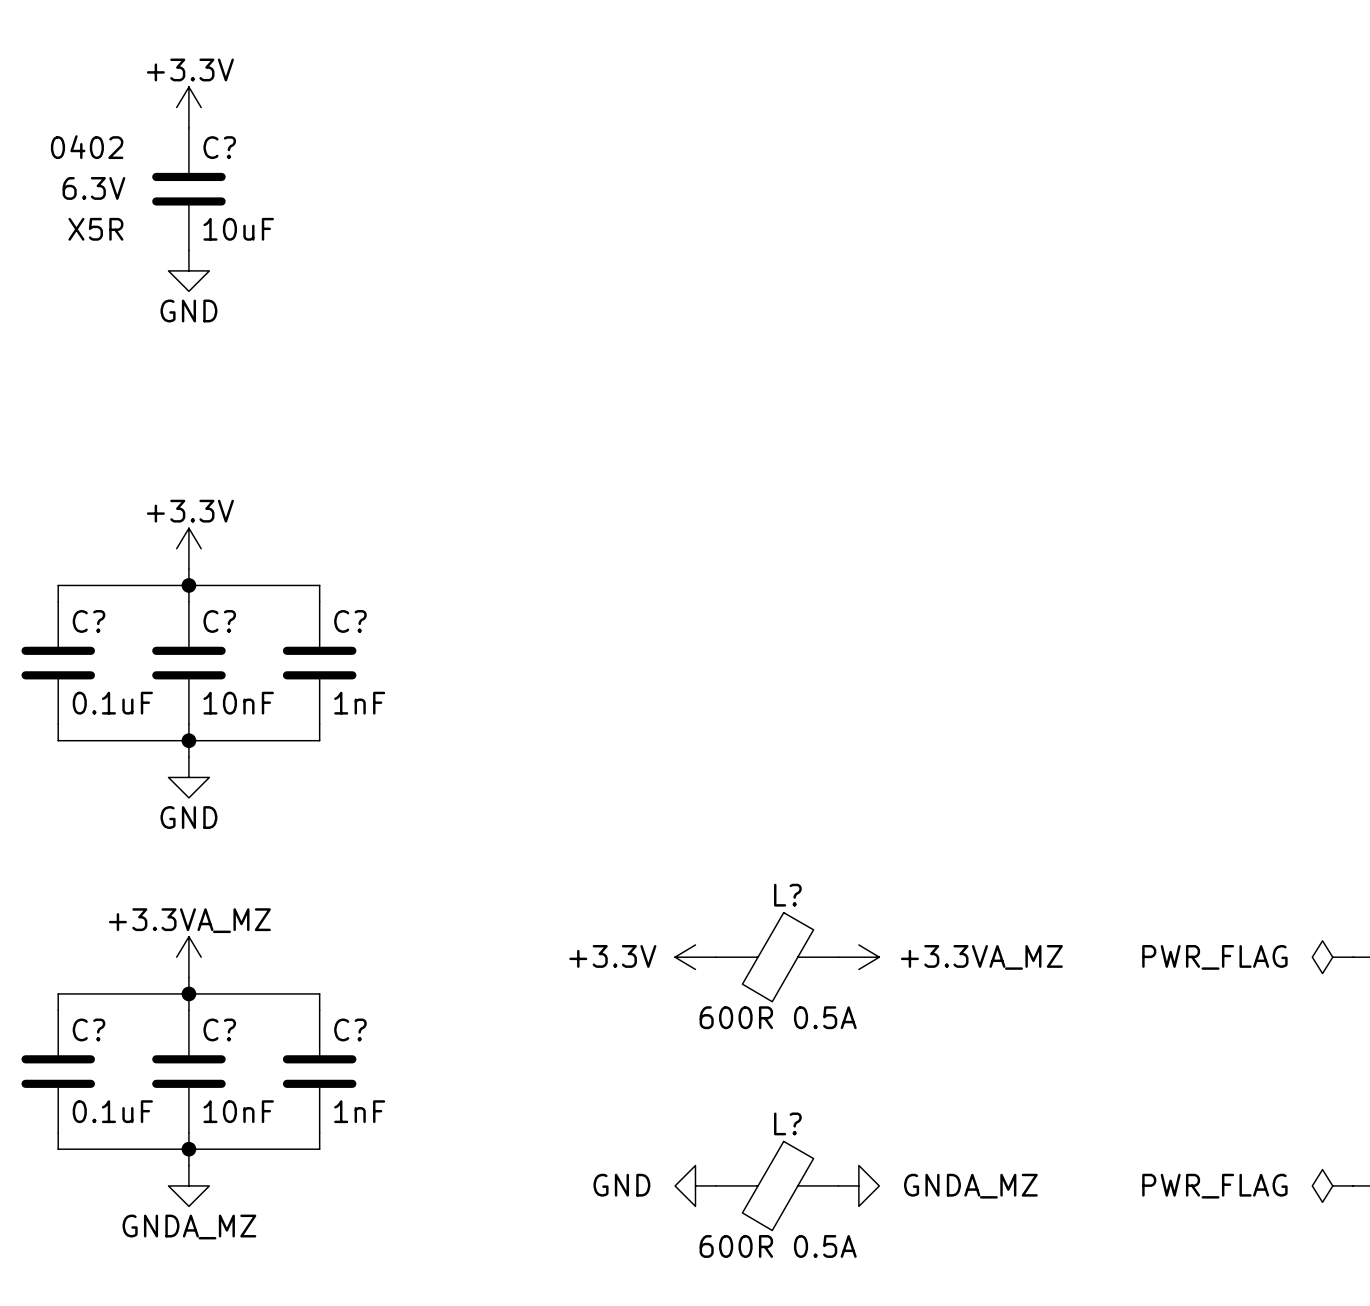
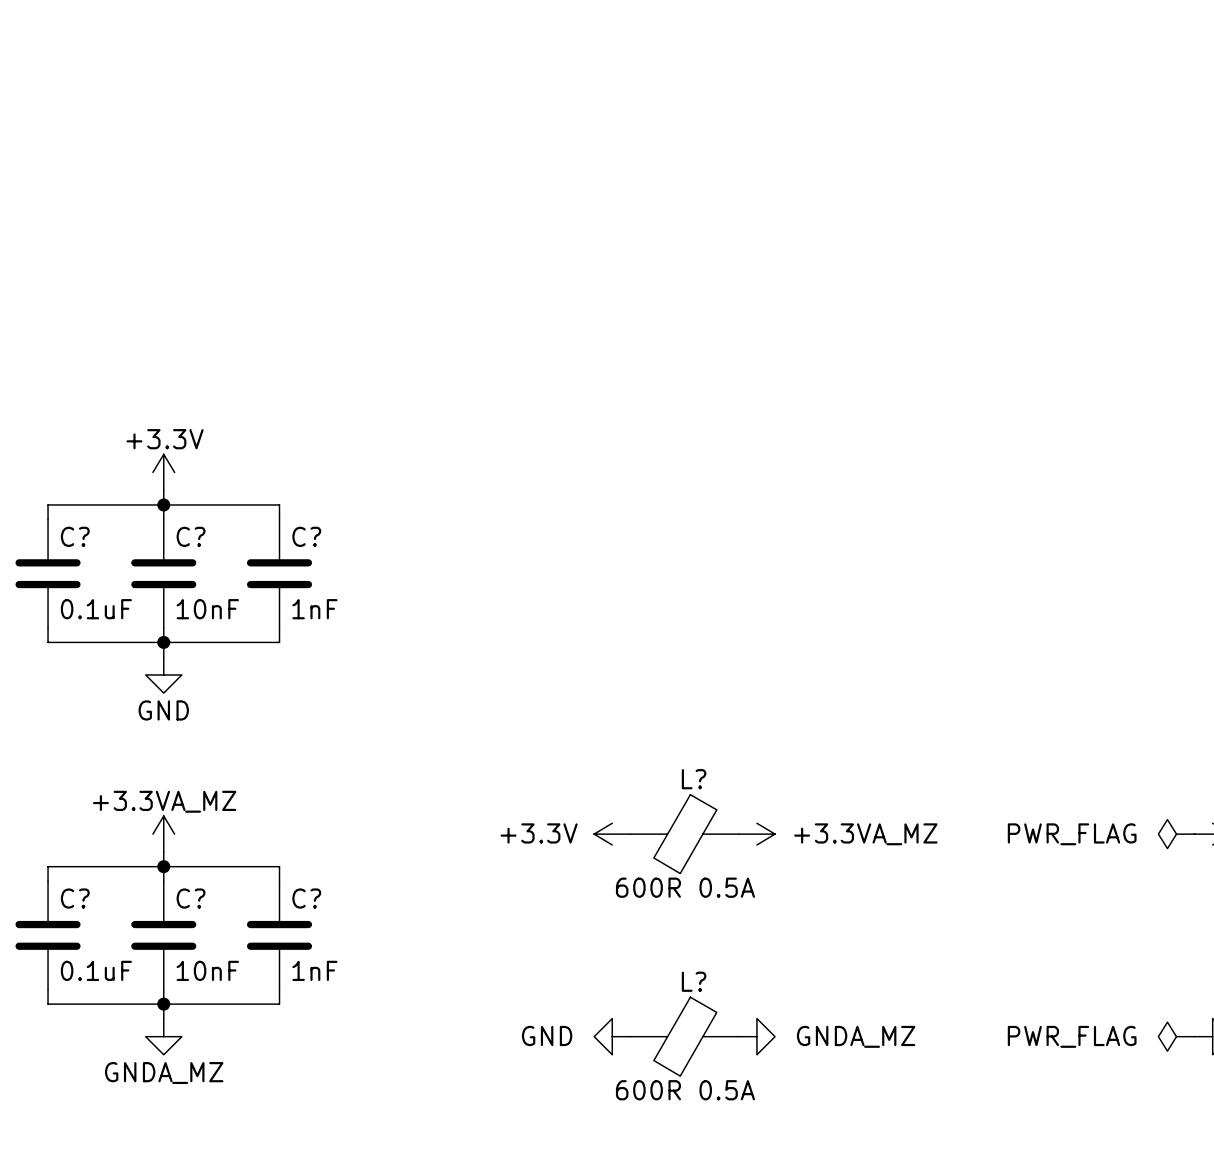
power symbol: +3.3V (188, 107) -> none
C?: 10uF (188, 189) -> none
power symbol: GND (188, 270) -> none

